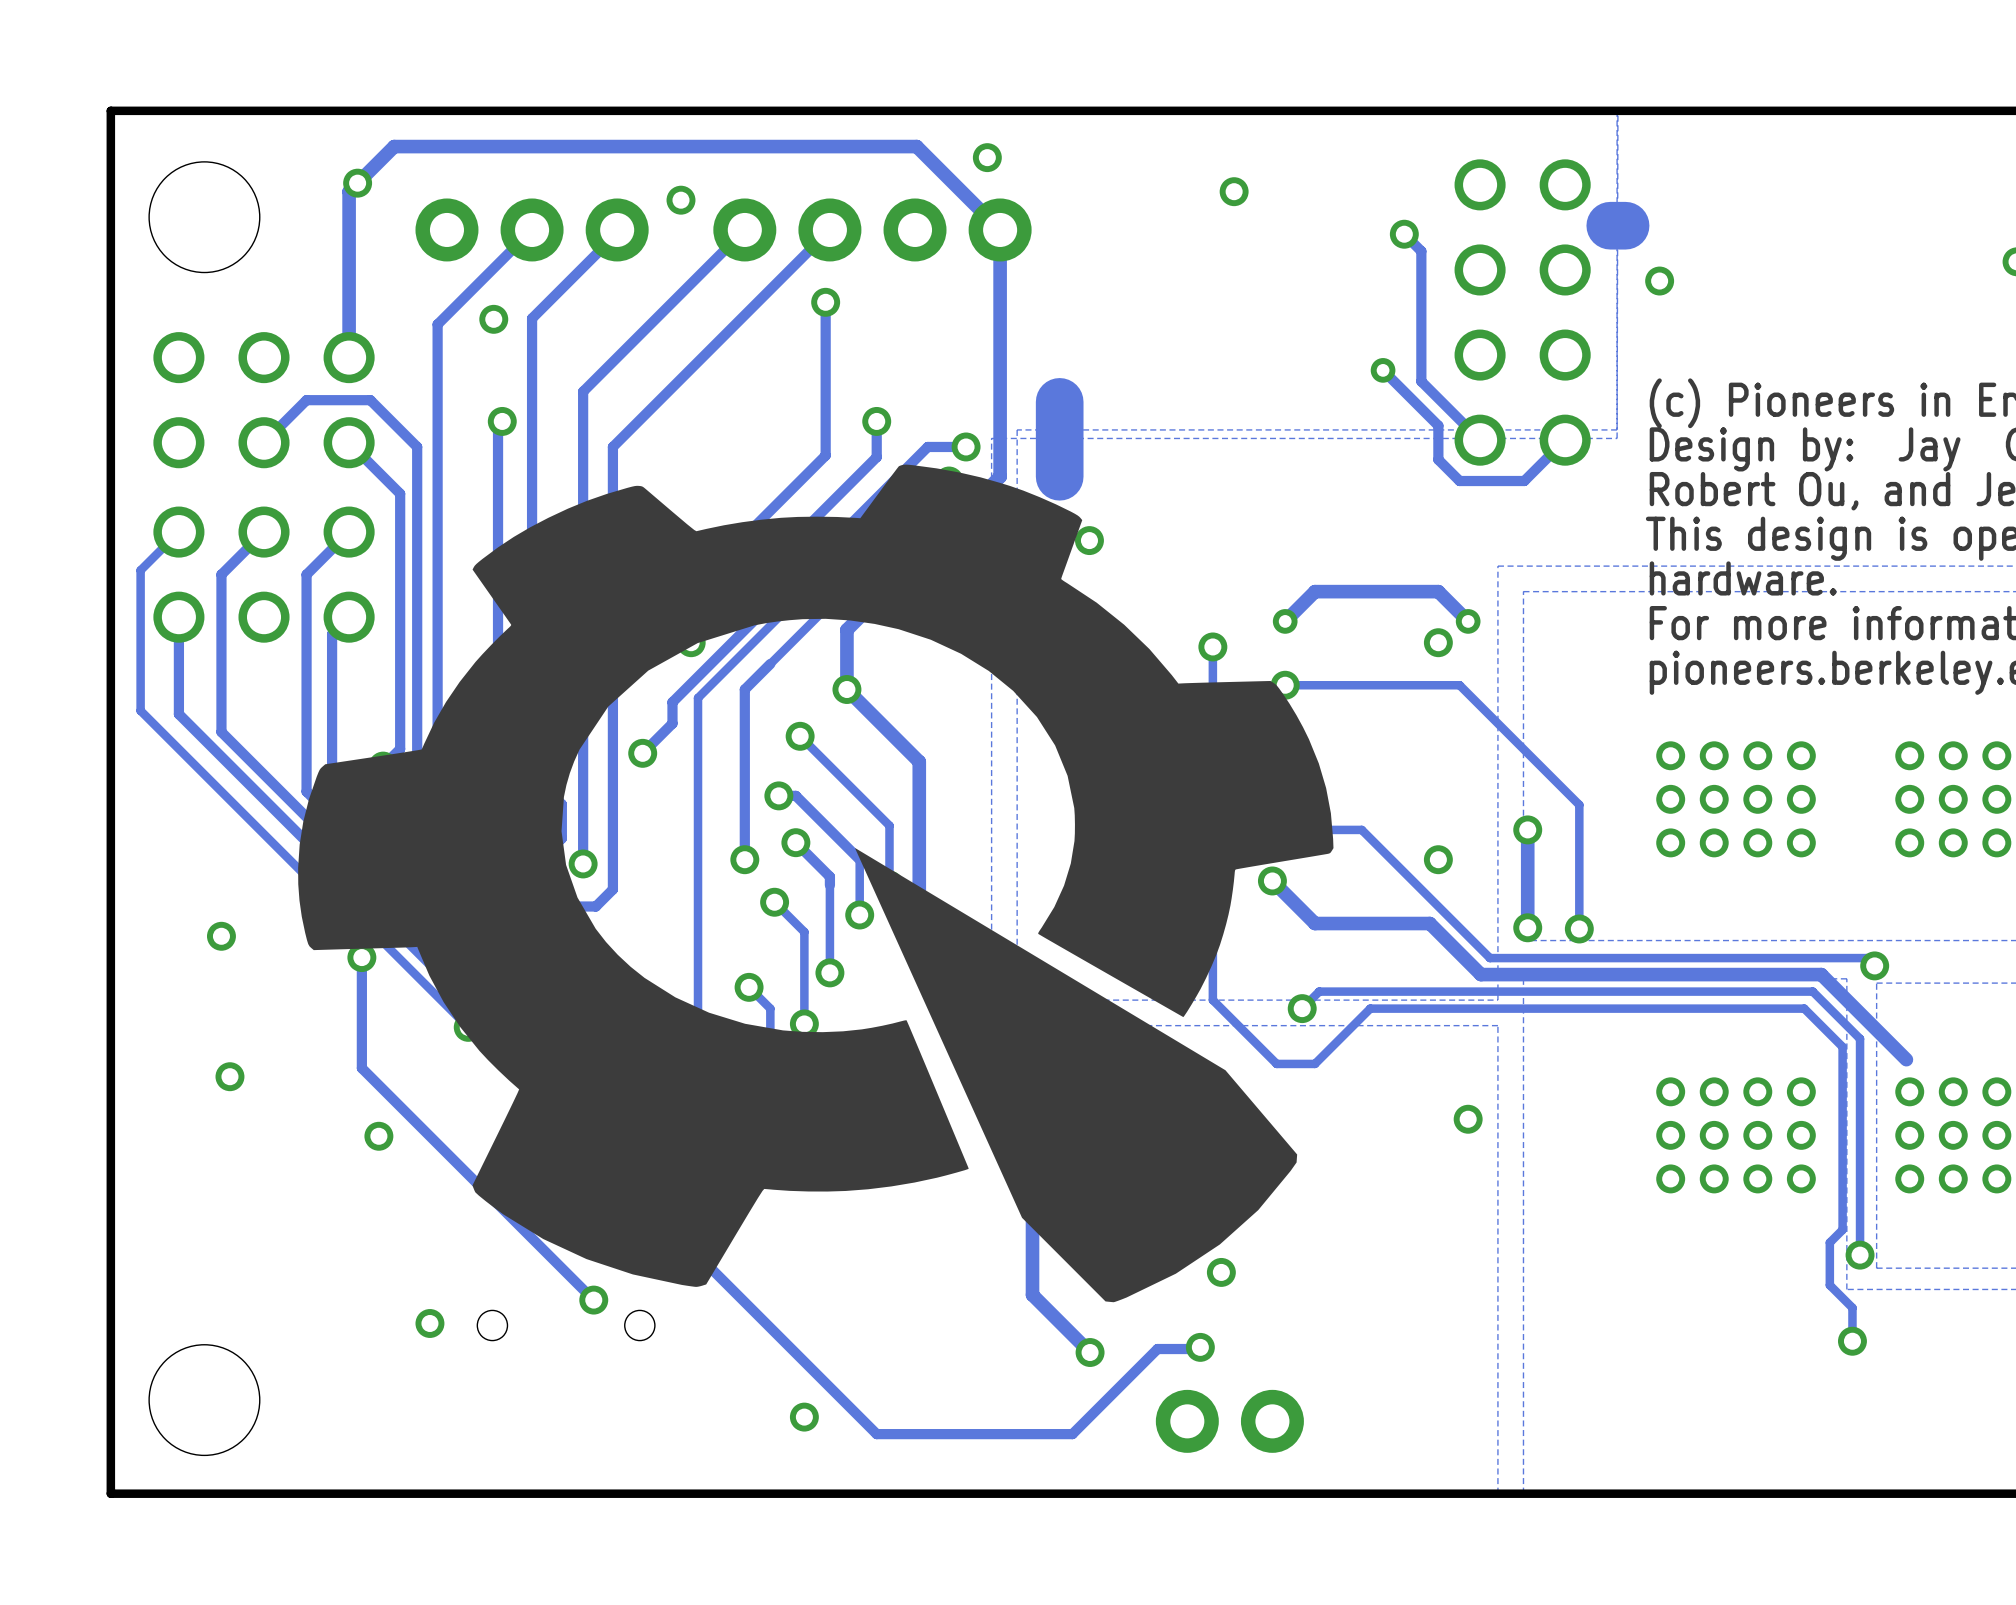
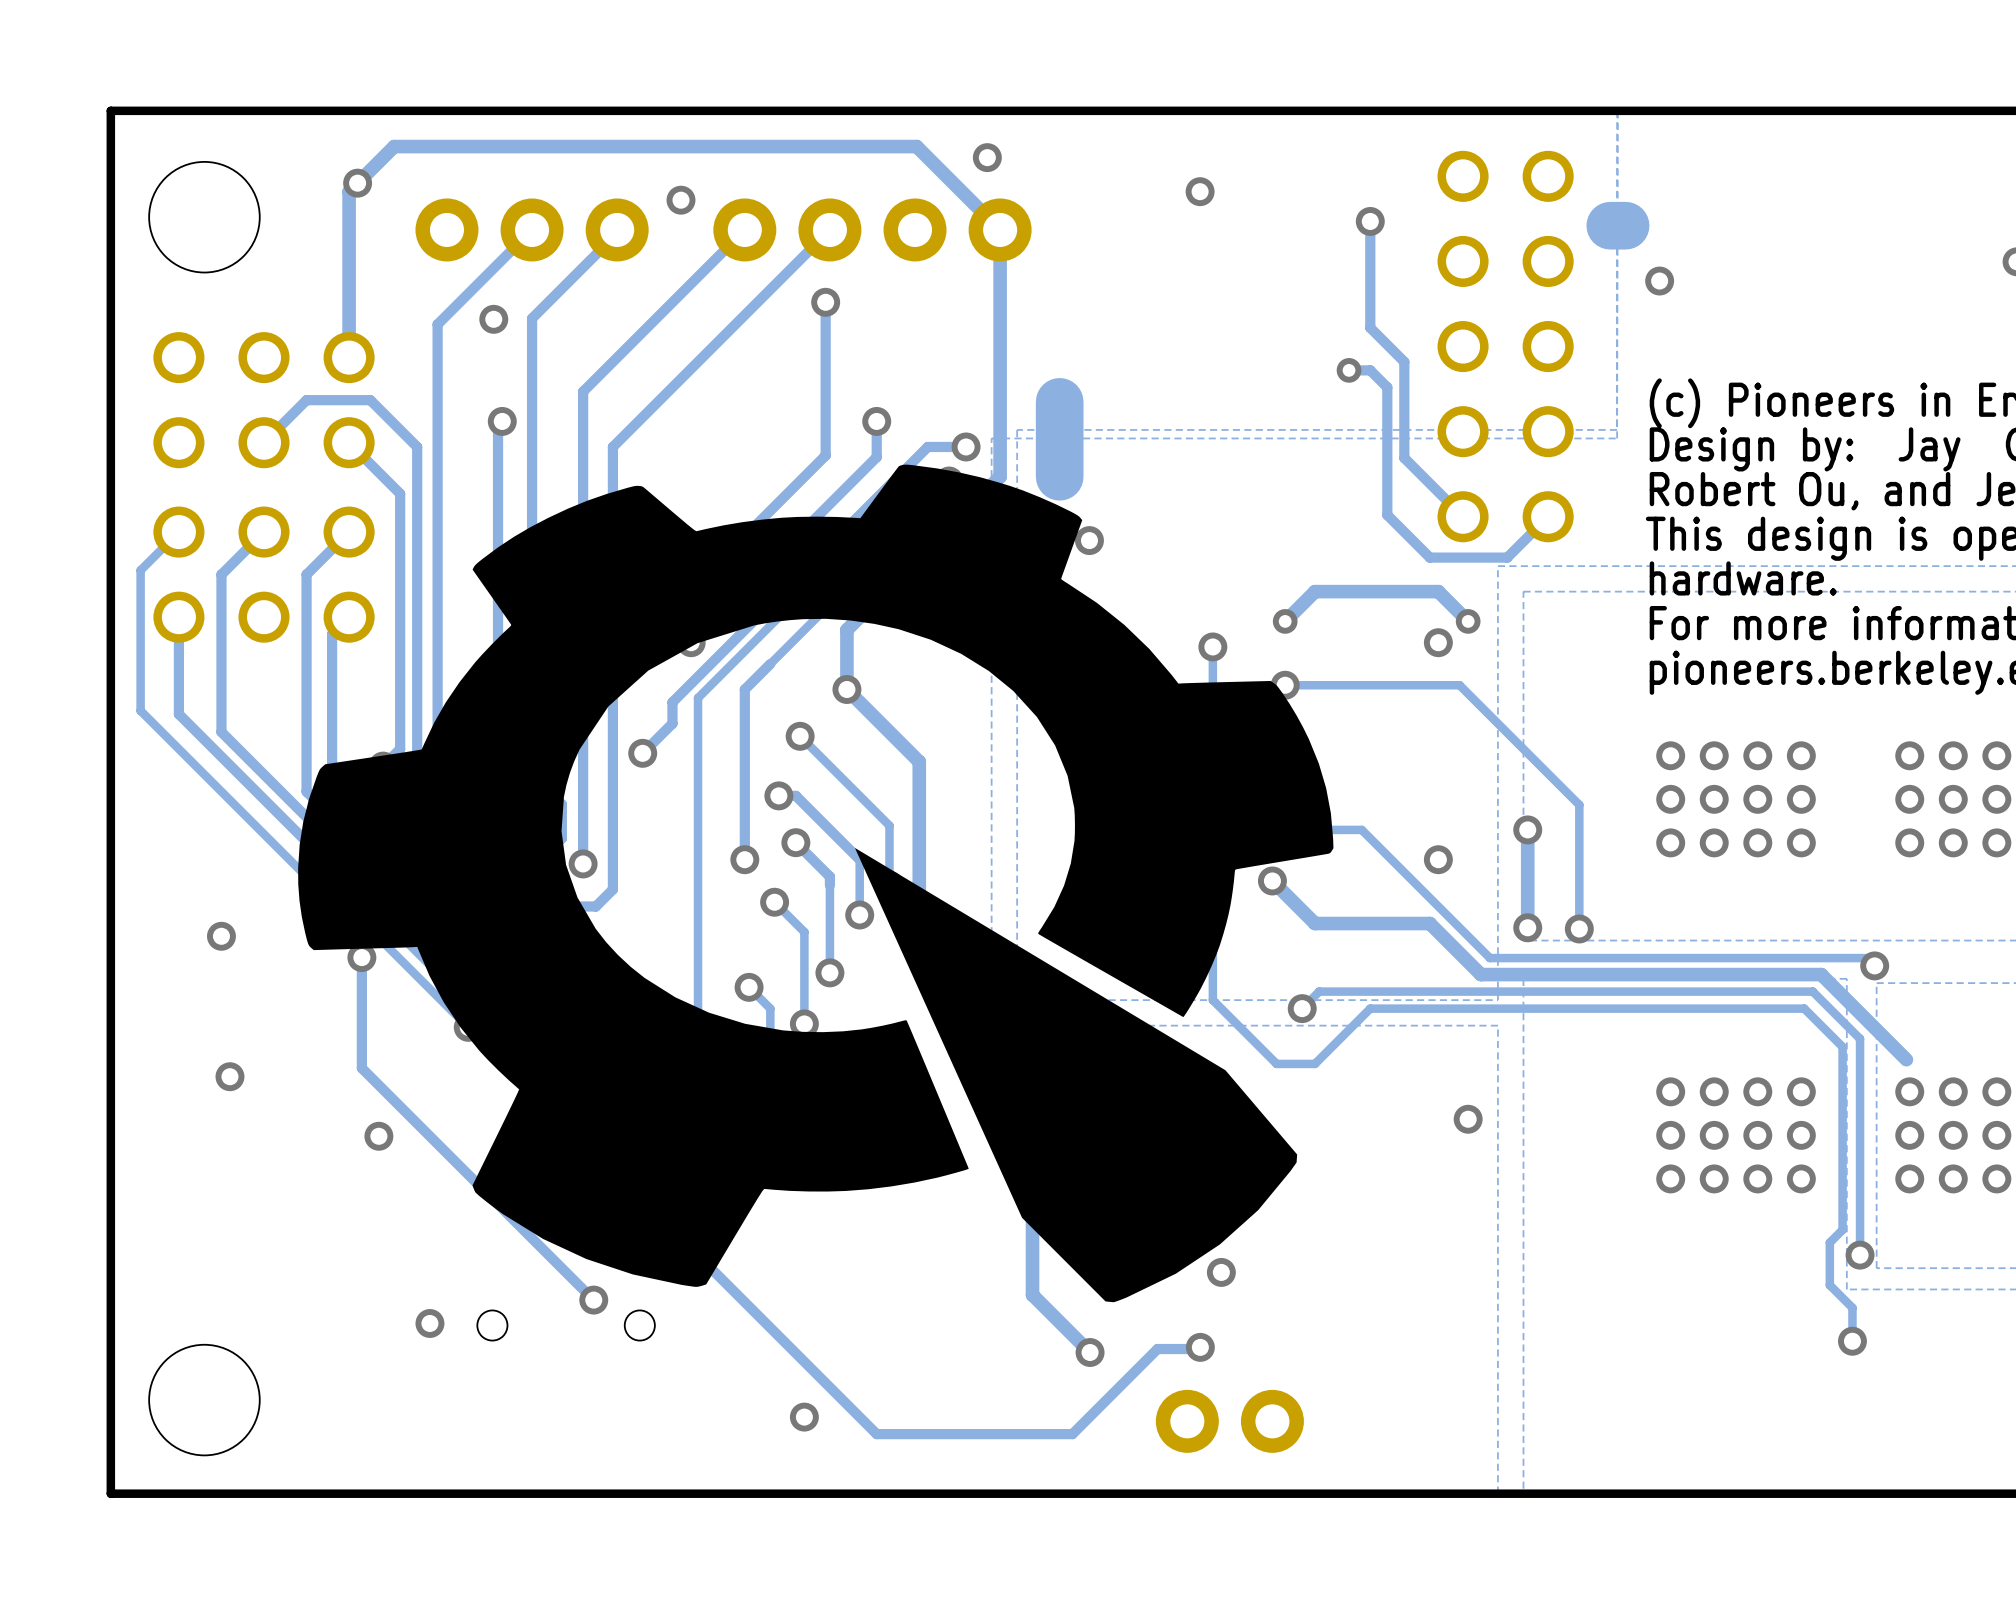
via position: (1234, 191) -> (1200, 191)
track: none -> (1370, 221) (1370, 327) (1404, 361) (1404, 458) (1463, 516)
track: (1404, 234) (1421, 251) (1421, 381) (1480, 440) -> none
via position: (1404, 234) -> (1370, 221)
part: (1522, 312) -> none
part: none -> (1505, 346)
track: none -> (1349, 370) (1370, 370) (1387, 387) (1387, 515) (1429, 557) (1507, 557) (1548, 516)
track: (1383, 370) (1438, 425) (1438, 459) (1459, 481) (1524, 481) (1565, 440) -> none
via position: (1383, 370) -> (1349, 370)

